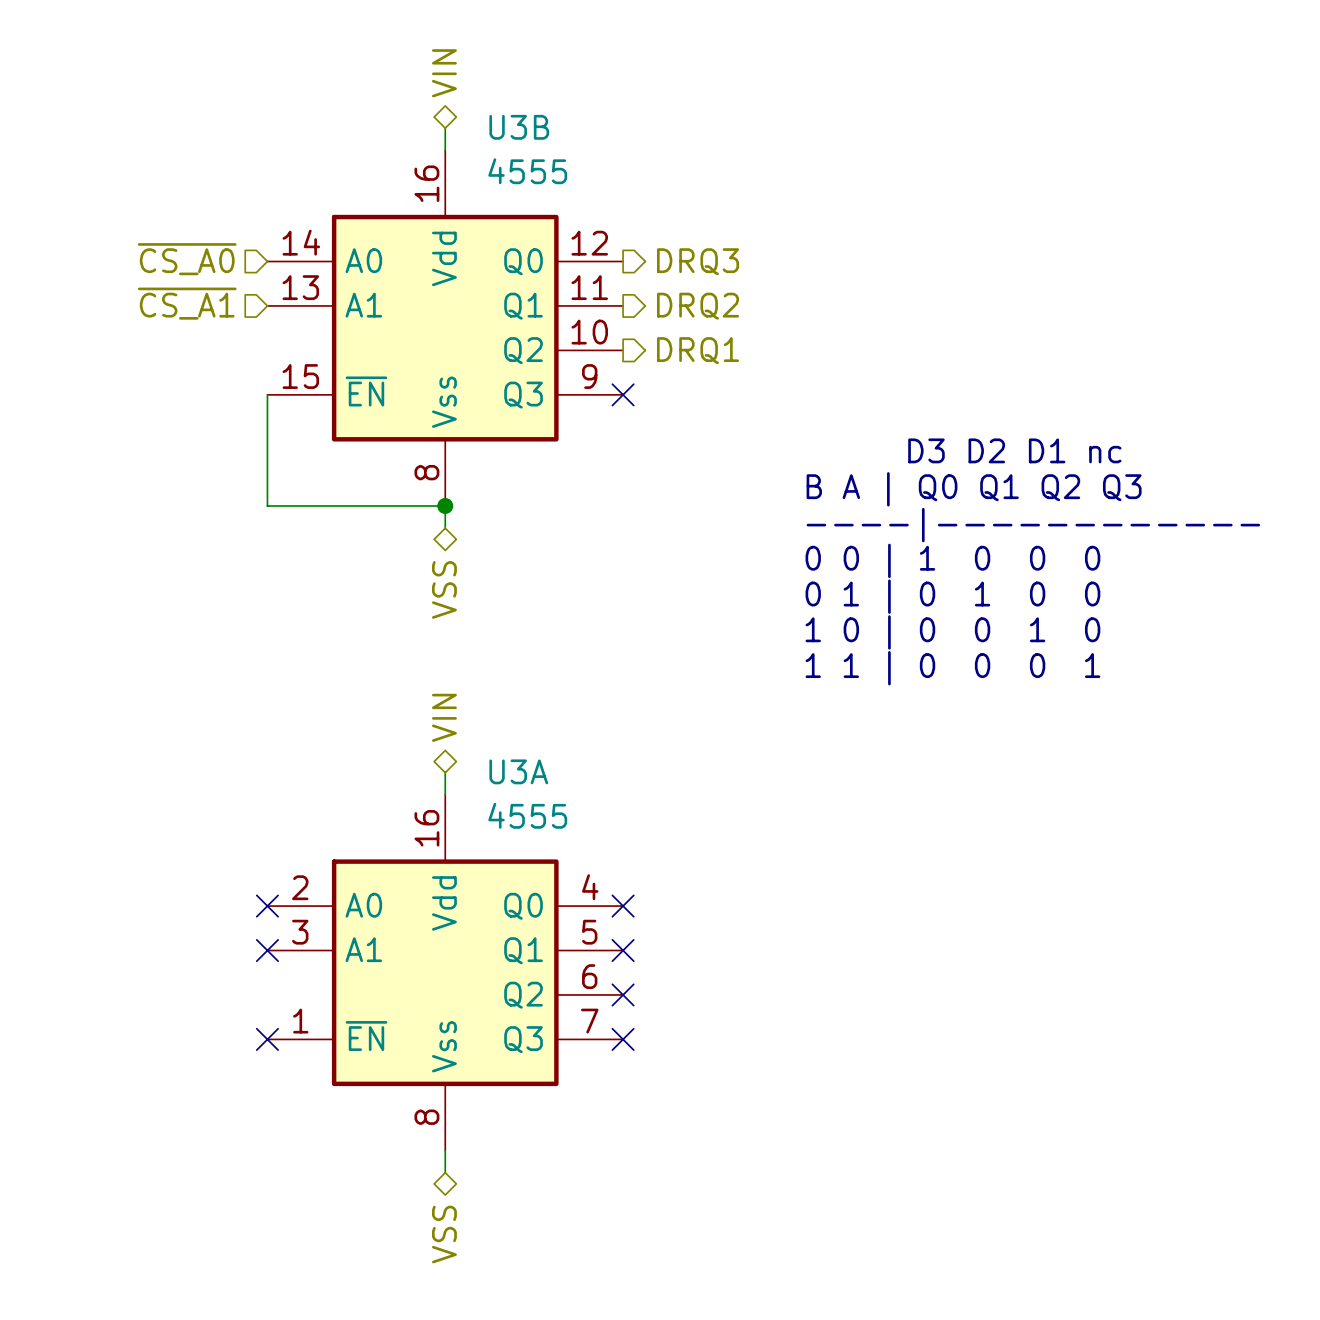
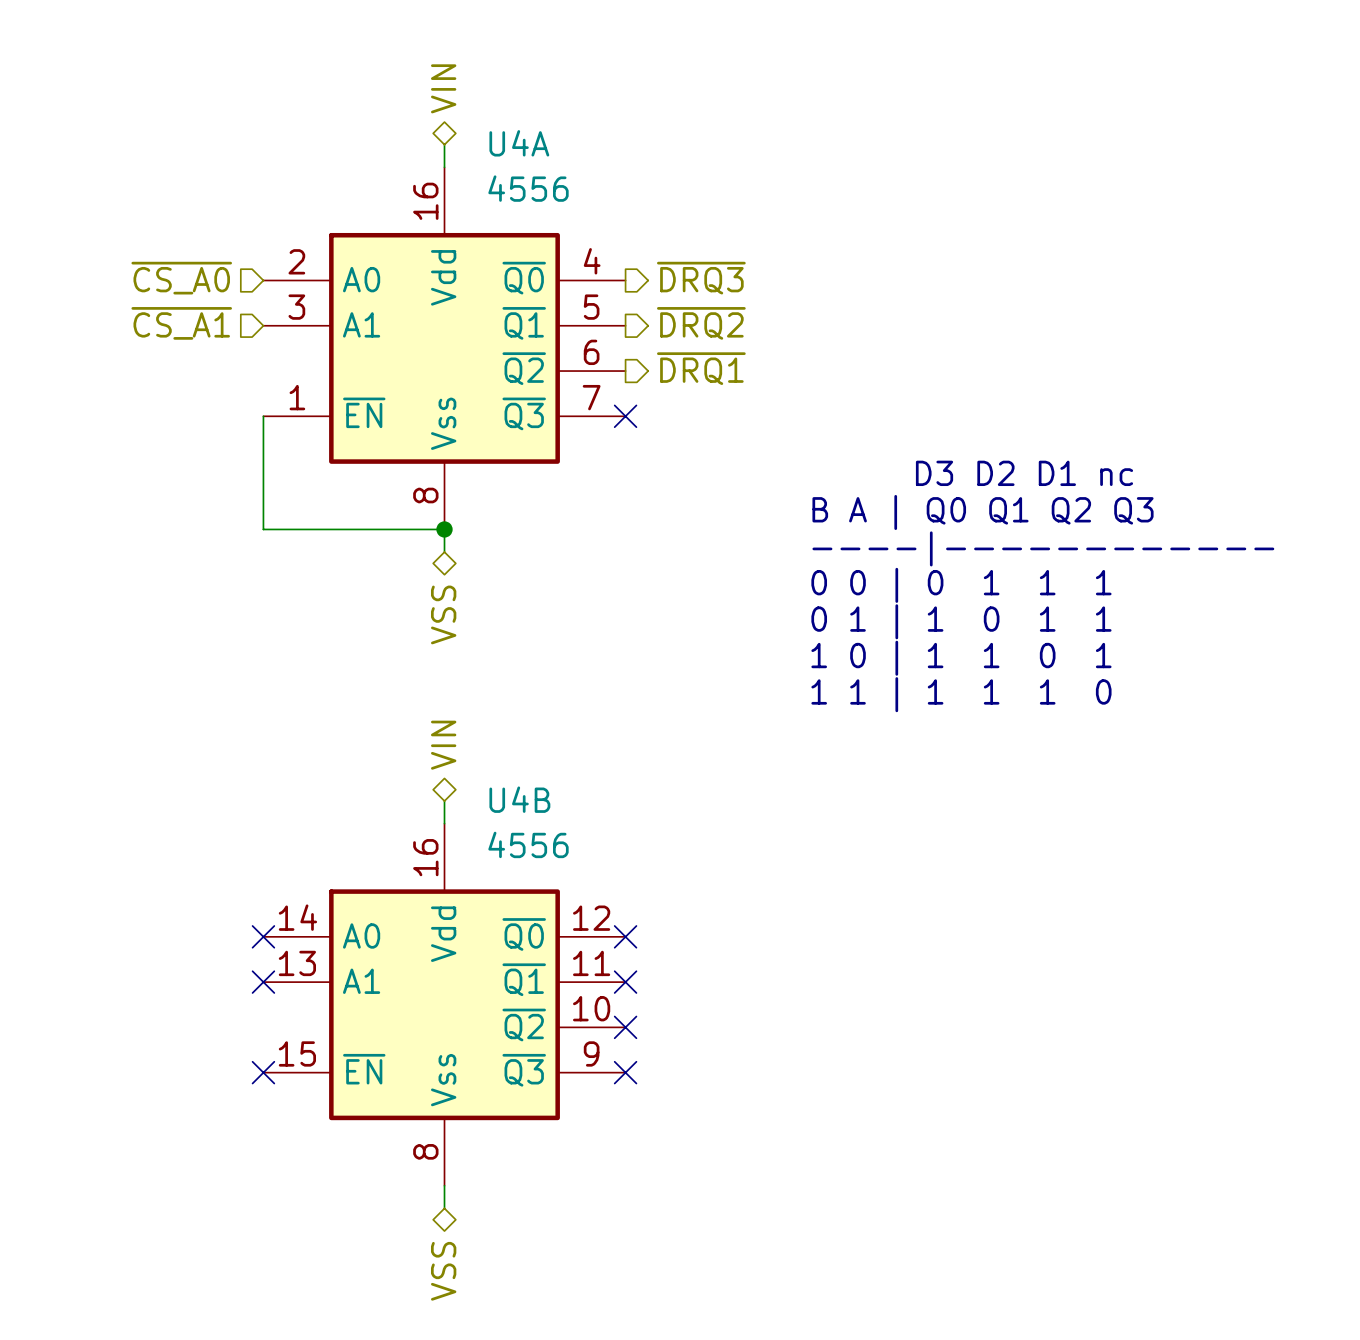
U3B name: U3B (519, 127) -> U4A (519, 143)
U3B symbol: [267, 150, 624, 506] -> [263, 167, 626, 530]
U3B value: 4555 (527, 171) -> 4556 (528, 188)
hierarchical label: DRQ3 (698, 261) -> ~{DRQ3} (701, 278)
hierarchical label: DRQ2 (698, 306) -> ~{DRQ2} (701, 323)
hierarchical label: DRQ1 (698, 350) -> ~{DRQ1} (701, 368)
text: 0 0 | 1 0 0 0 (952, 560) -> 0 0 | 0 1 1 1 (961, 585)
text: 0 1 | 0 1 0 0 (952, 596) -> 0 1 | 1 0 1 1 (961, 621)
text: 1 0 | 0 0 1 0 (952, 632) -> 1 0 | 1 1 0 1 (961, 658)
text: 1 1 | 0 0 0 1 (952, 668) -> 1 1 | 1 1 1 0 (961, 694)
U3A name: U3A (518, 771) -> U4B (519, 799)
U3A symbol: [267, 794, 624, 1151] -> [263, 823, 626, 1186]
U3A value: 4555 (527, 815) -> 4556 (528, 844)

